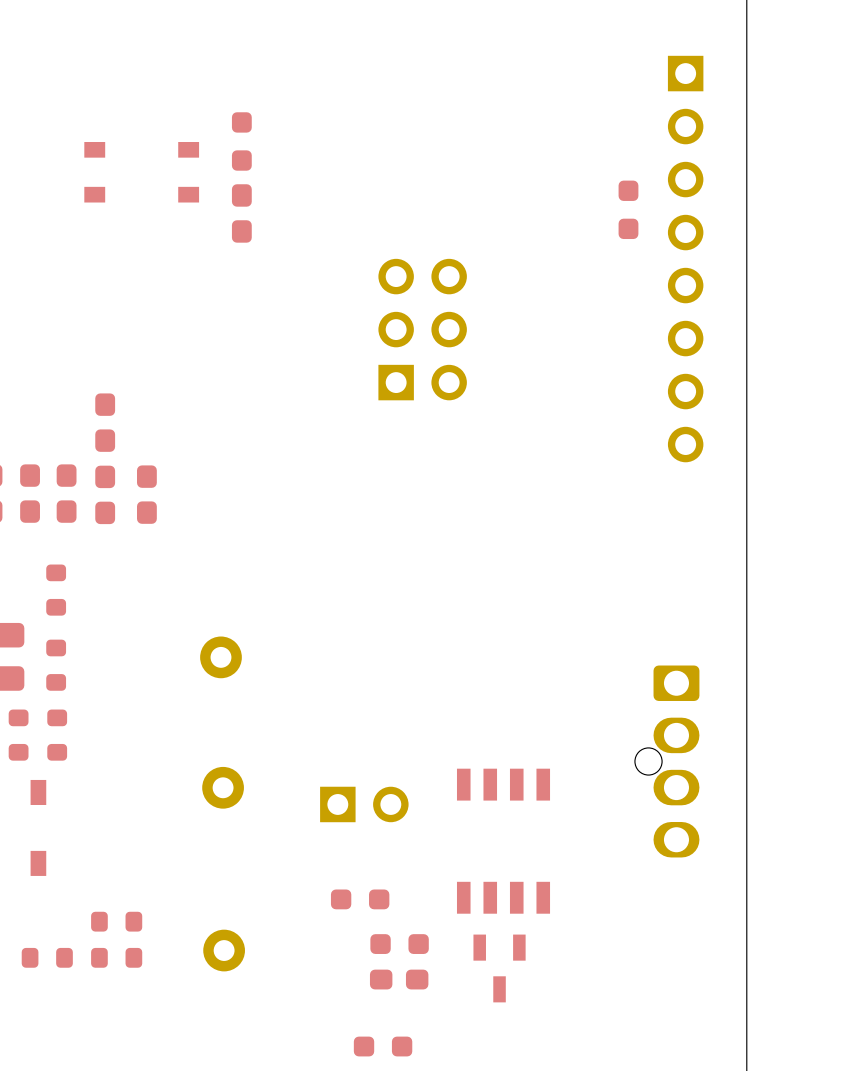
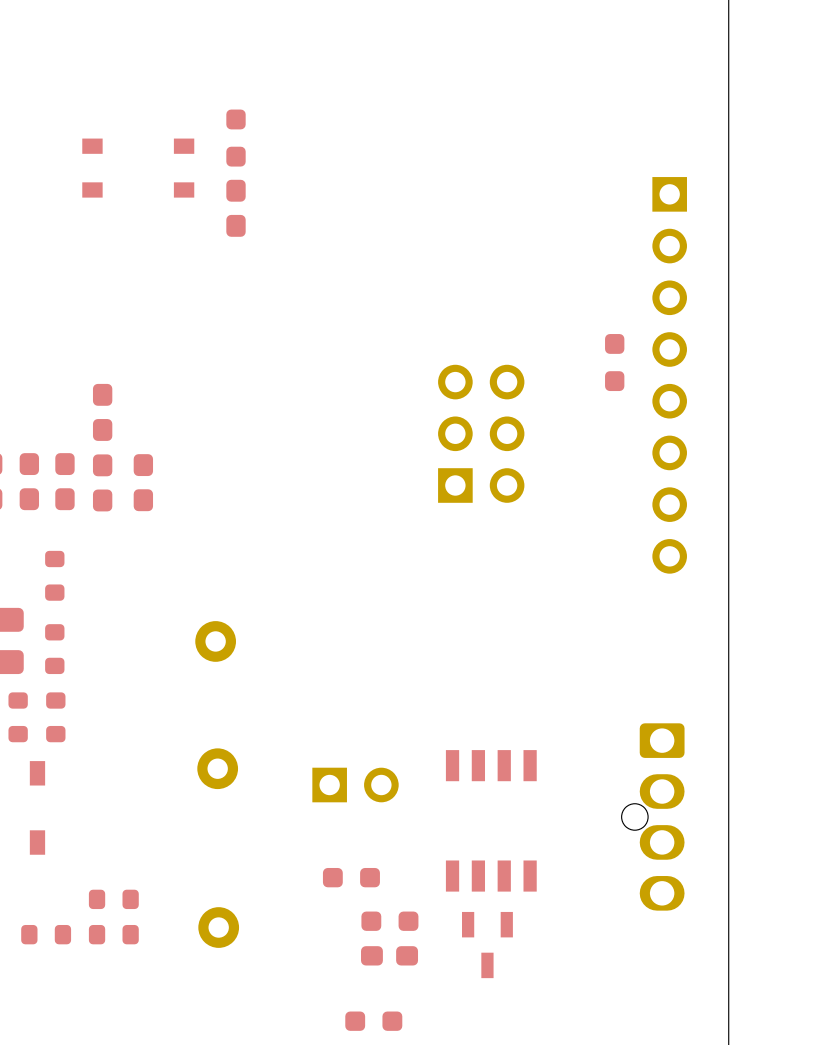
part position: (628, 209) -> (614, 362)
part position: (685, 259) -> (669, 375)
part position: (422, 329) -> (481, 433)
part position: (667, 761) -> (653, 816)

